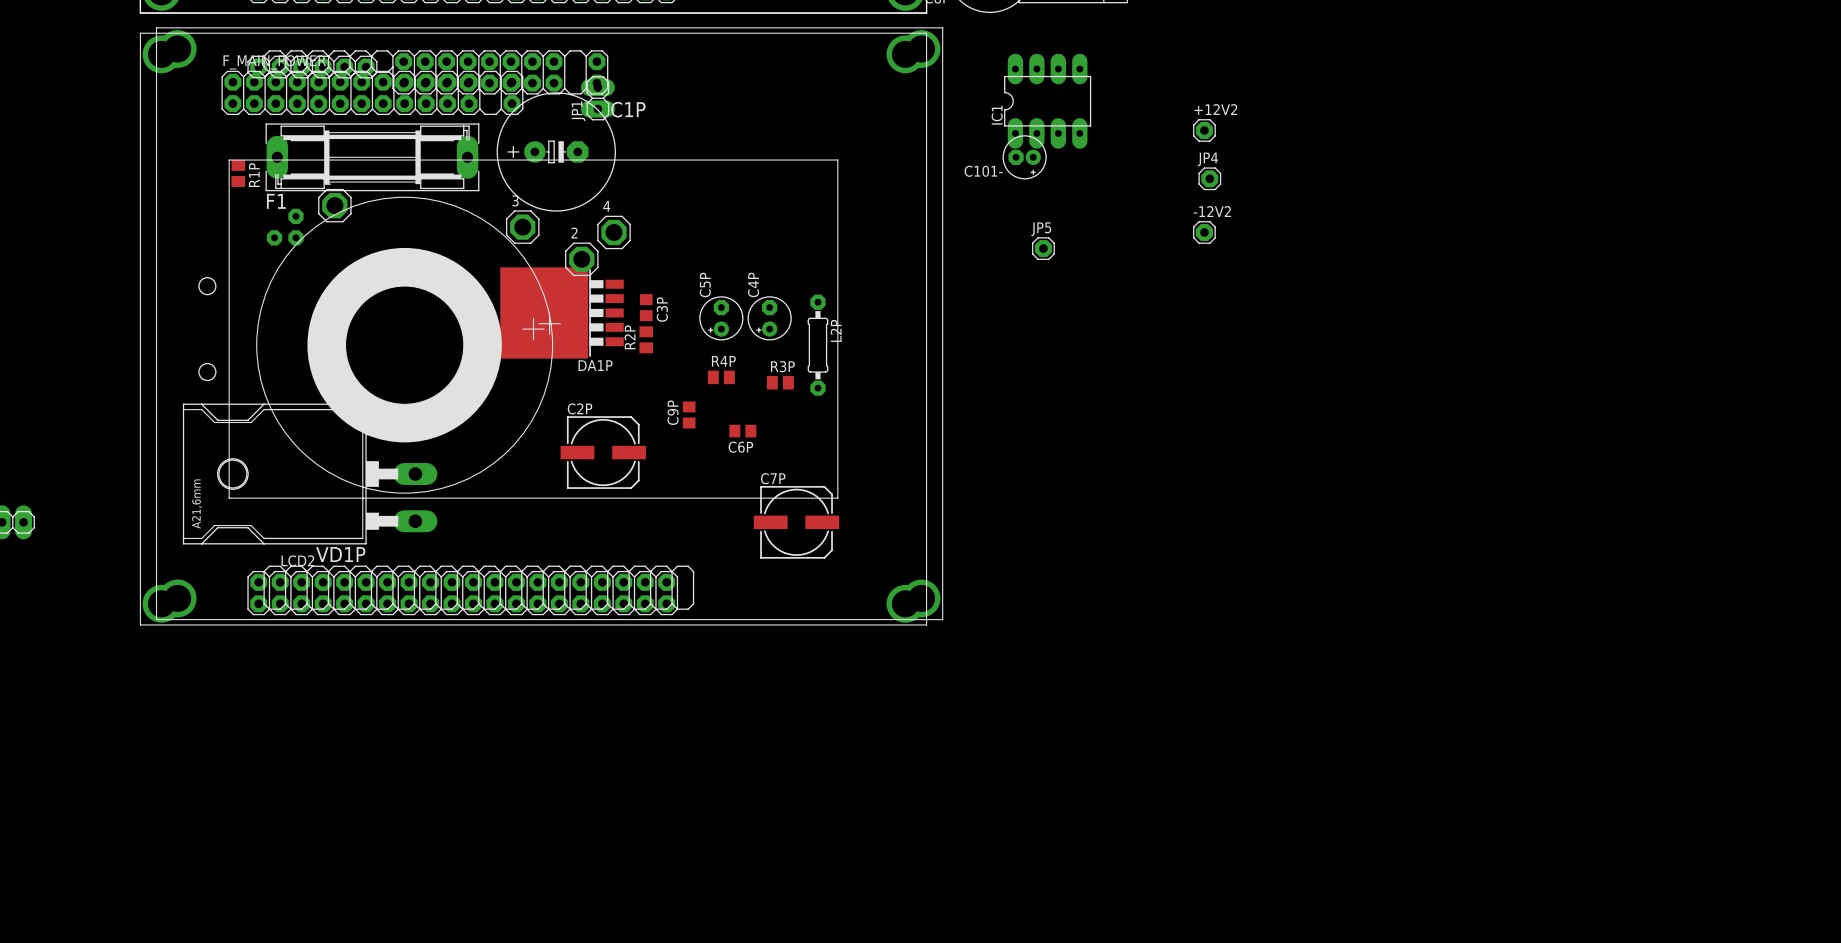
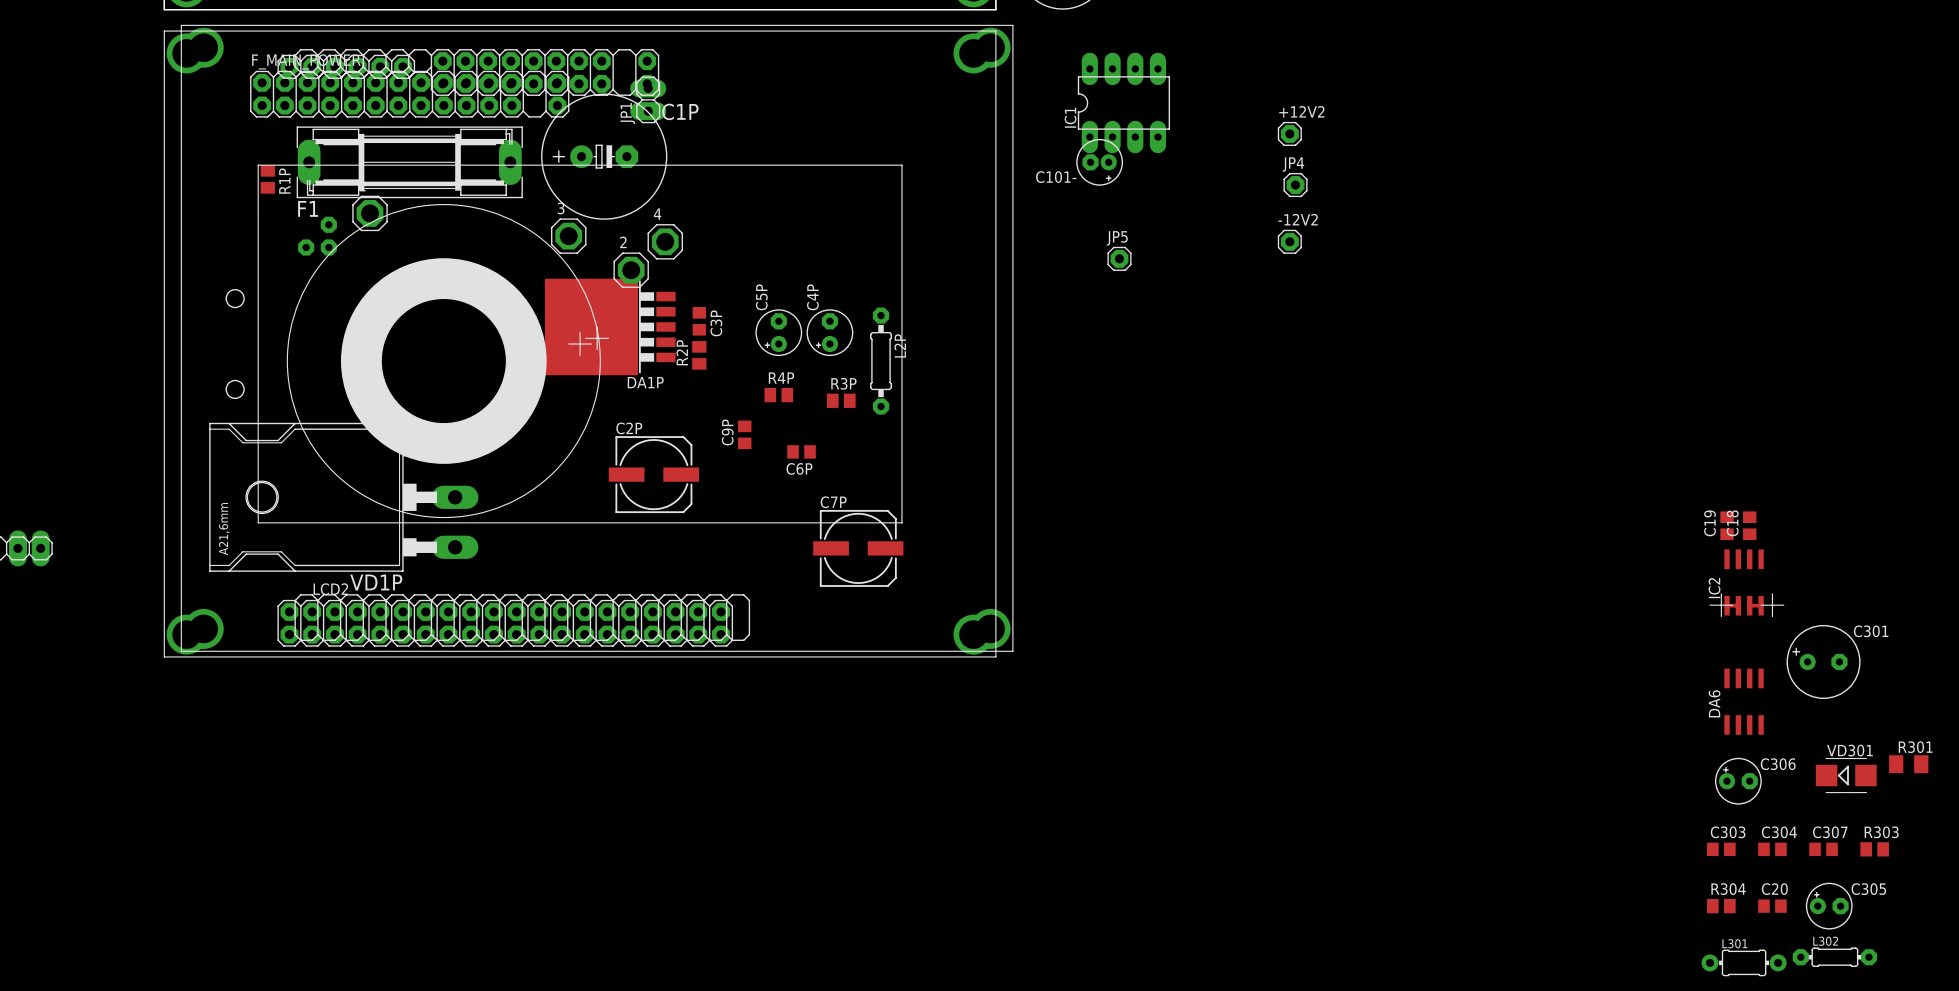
C19: none -> (1727, 525)
C18: none -> (1749, 525)
IC2: none -> (1744, 582)
drawing: none -> [1709, 593, 1734, 618]
drawing: none -> [1760, 593, 1785, 618]
track: none -> (1727, 605) (1738, 605)
track: none -> (1749, 605) (1761, 605)
C301: none -> (1823, 661)
DA6: none -> (1744, 701)
R301: none -> (1908, 764)
VD301: none -> (1846, 775)
C306: none -> (1738, 781)
C303: none -> (1721, 849)
C304: none -> (1772, 849)
C307: none -> (1823, 849)
R303: none -> (1874, 849)
R304: none -> (1721, 906)
C20: none -> (1772, 906)
C305: none -> (1829, 906)
L302: none -> (1834, 957)
L301: none -> (1744, 962)

